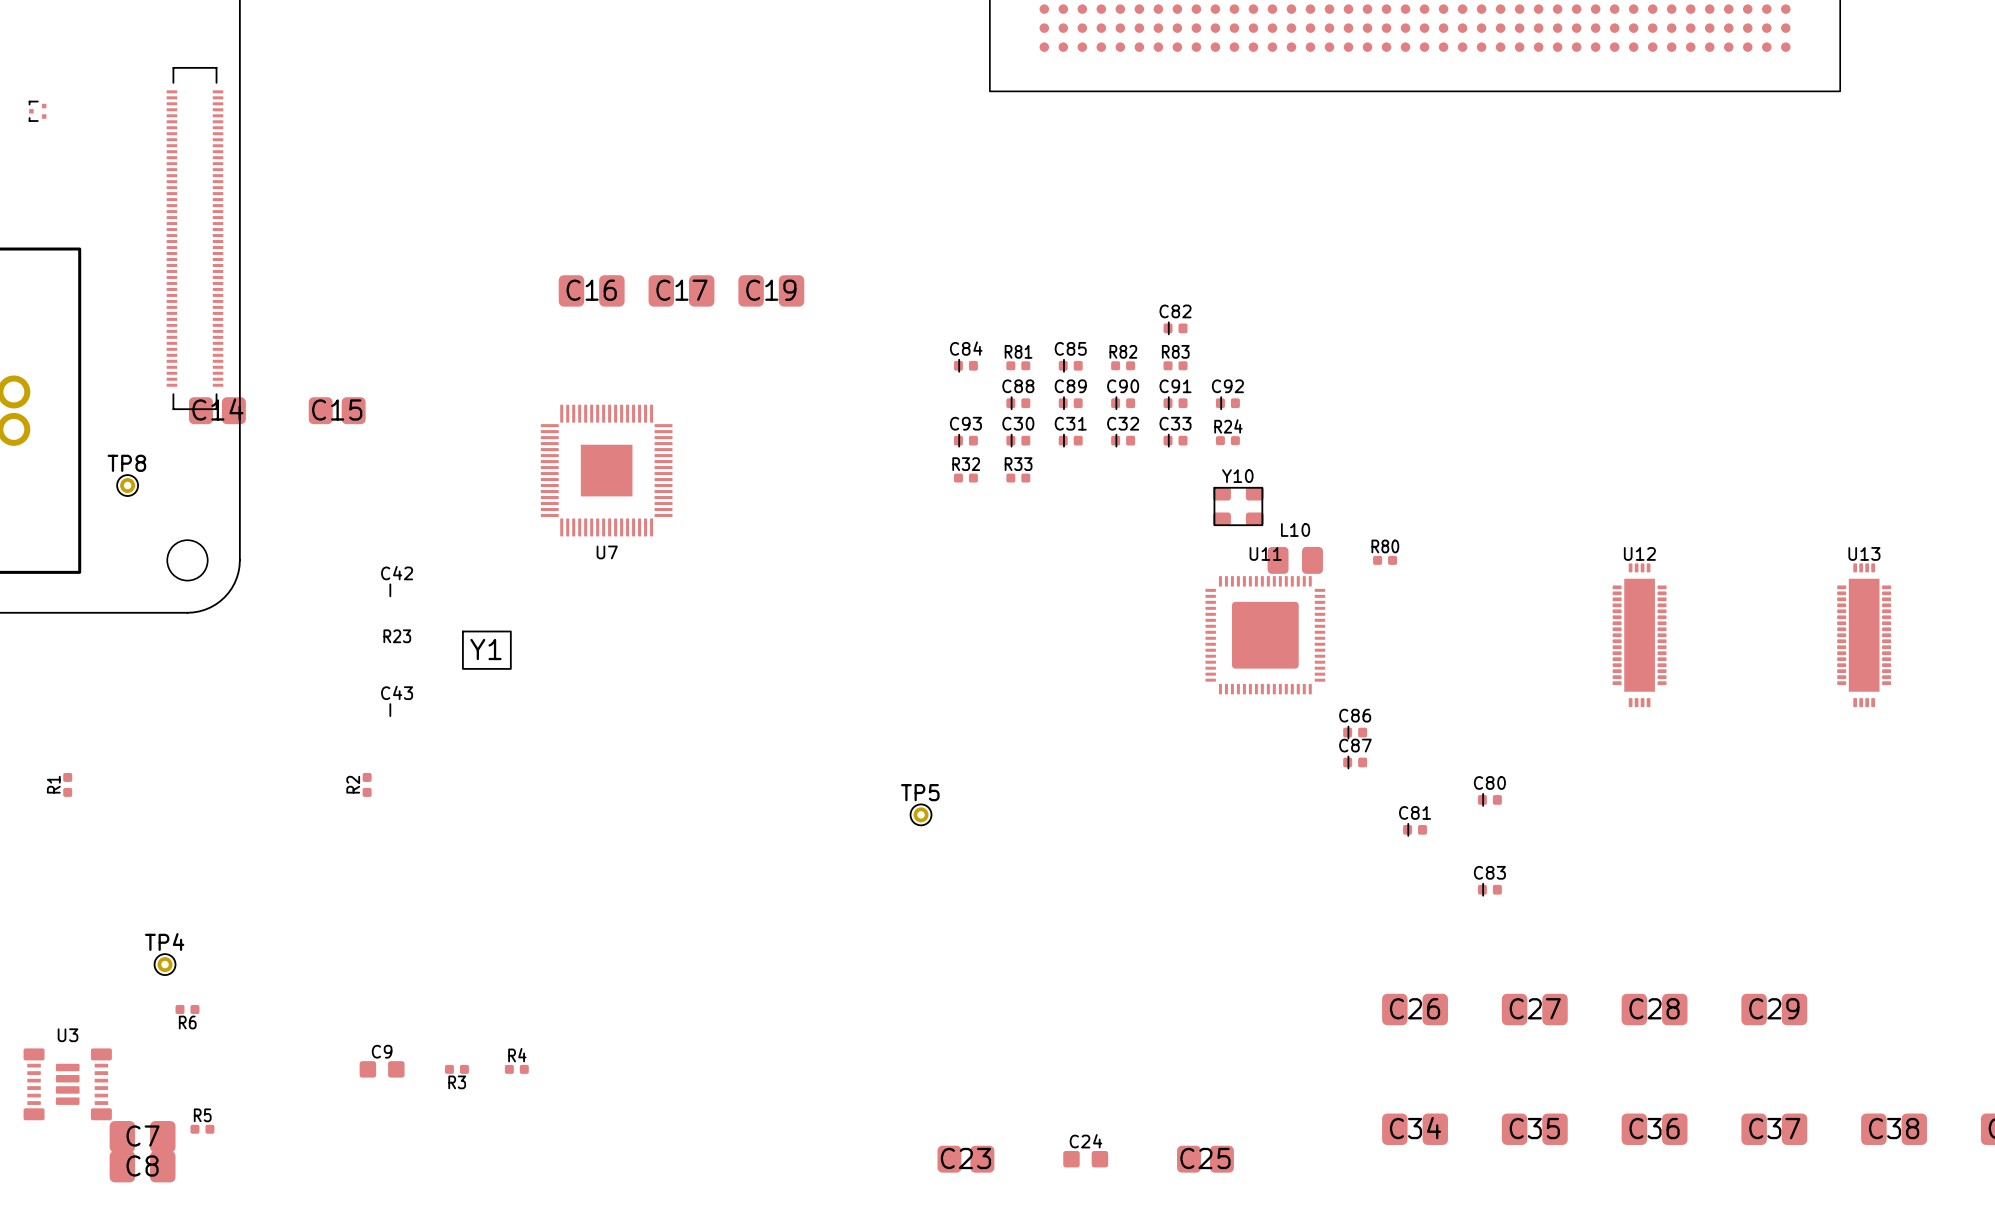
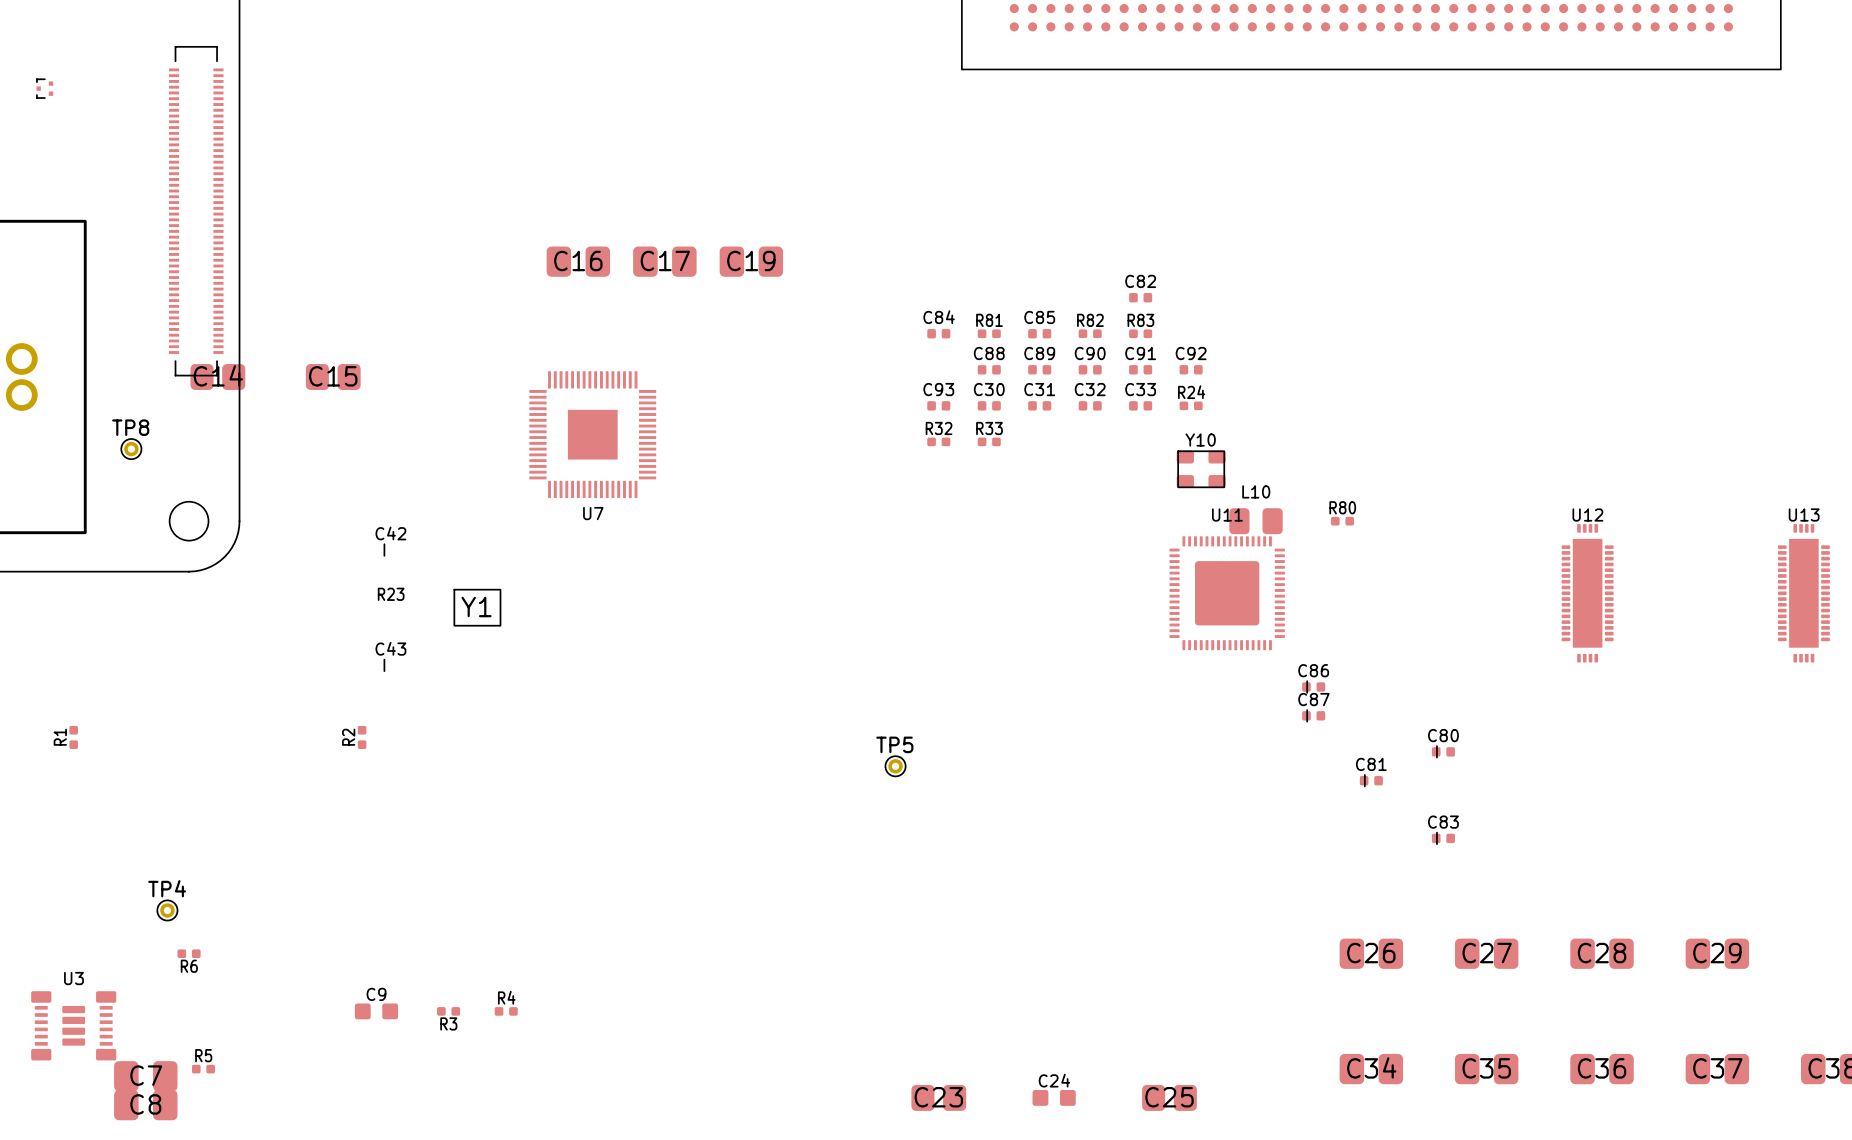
C82 footprint: [1163, 321, 1188, 336] -> [1129, 293, 1153, 303]
C84 footprint: [953, 358, 978, 373] -> [927, 329, 951, 339]
C85 footprint: [1058, 358, 1083, 373] -> [1028, 329, 1052, 339]
C88 footprint: [1006, 396, 1031, 411] -> [977, 365, 1001, 375]
C89 footprint: [1058, 396, 1083, 411] -> [1028, 365, 1052, 375]
C90 footprint: [1111, 396, 1136, 411] -> [1078, 365, 1102, 375]
C91 footprint: [1163, 396, 1188, 411] -> [1129, 365, 1153, 375]
C92 footprint: [1215, 396, 1240, 411] -> [1179, 365, 1203, 375]
C93 footprint: [953, 433, 978, 448] -> [927, 401, 951, 411]
C30 footprint: [1006, 433, 1031, 448] -> [977, 401, 1001, 411]
C31 footprint: [1058, 433, 1083, 448] -> [1028, 401, 1052, 411]
C32 footprint: [1111, 433, 1136, 448] -> [1078, 401, 1102, 411]
C33 footprint: [1163, 433, 1188, 448] -> [1129, 401, 1153, 411]

